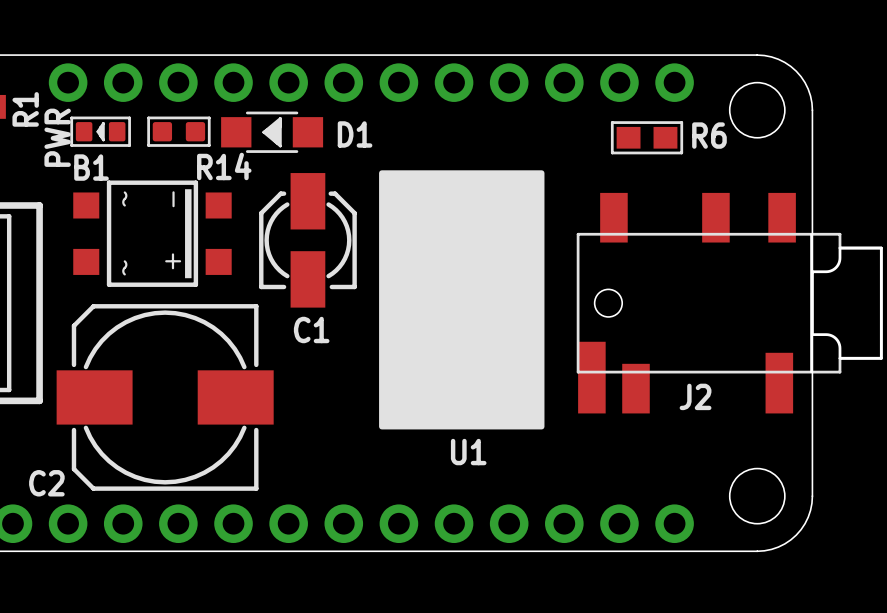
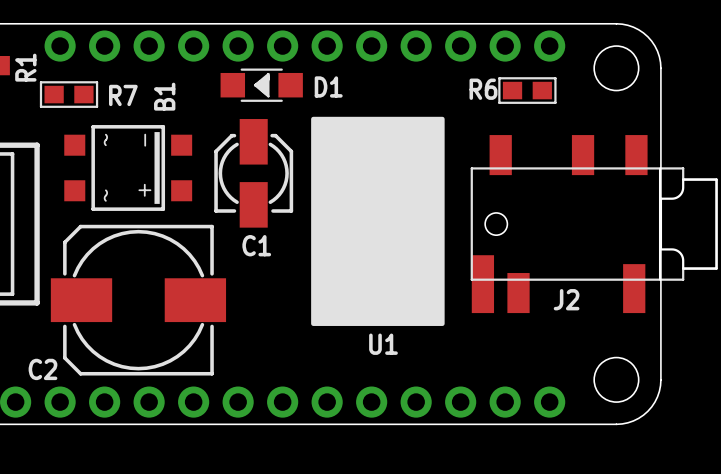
PWR: (100, 131) -> none
R14: (178, 131) -> none
D1 position: (272, 132) -> (261, 85)
R6 name position: R6 (709, 135) -> R6 (483, 89)
R7: none -> (69, 94)
B1 name rotation: 0° (91, 167) -> 90° counterclockwise (164, 96)
B1 name position: B1 (91, 167) -> B1 (164, 96)

